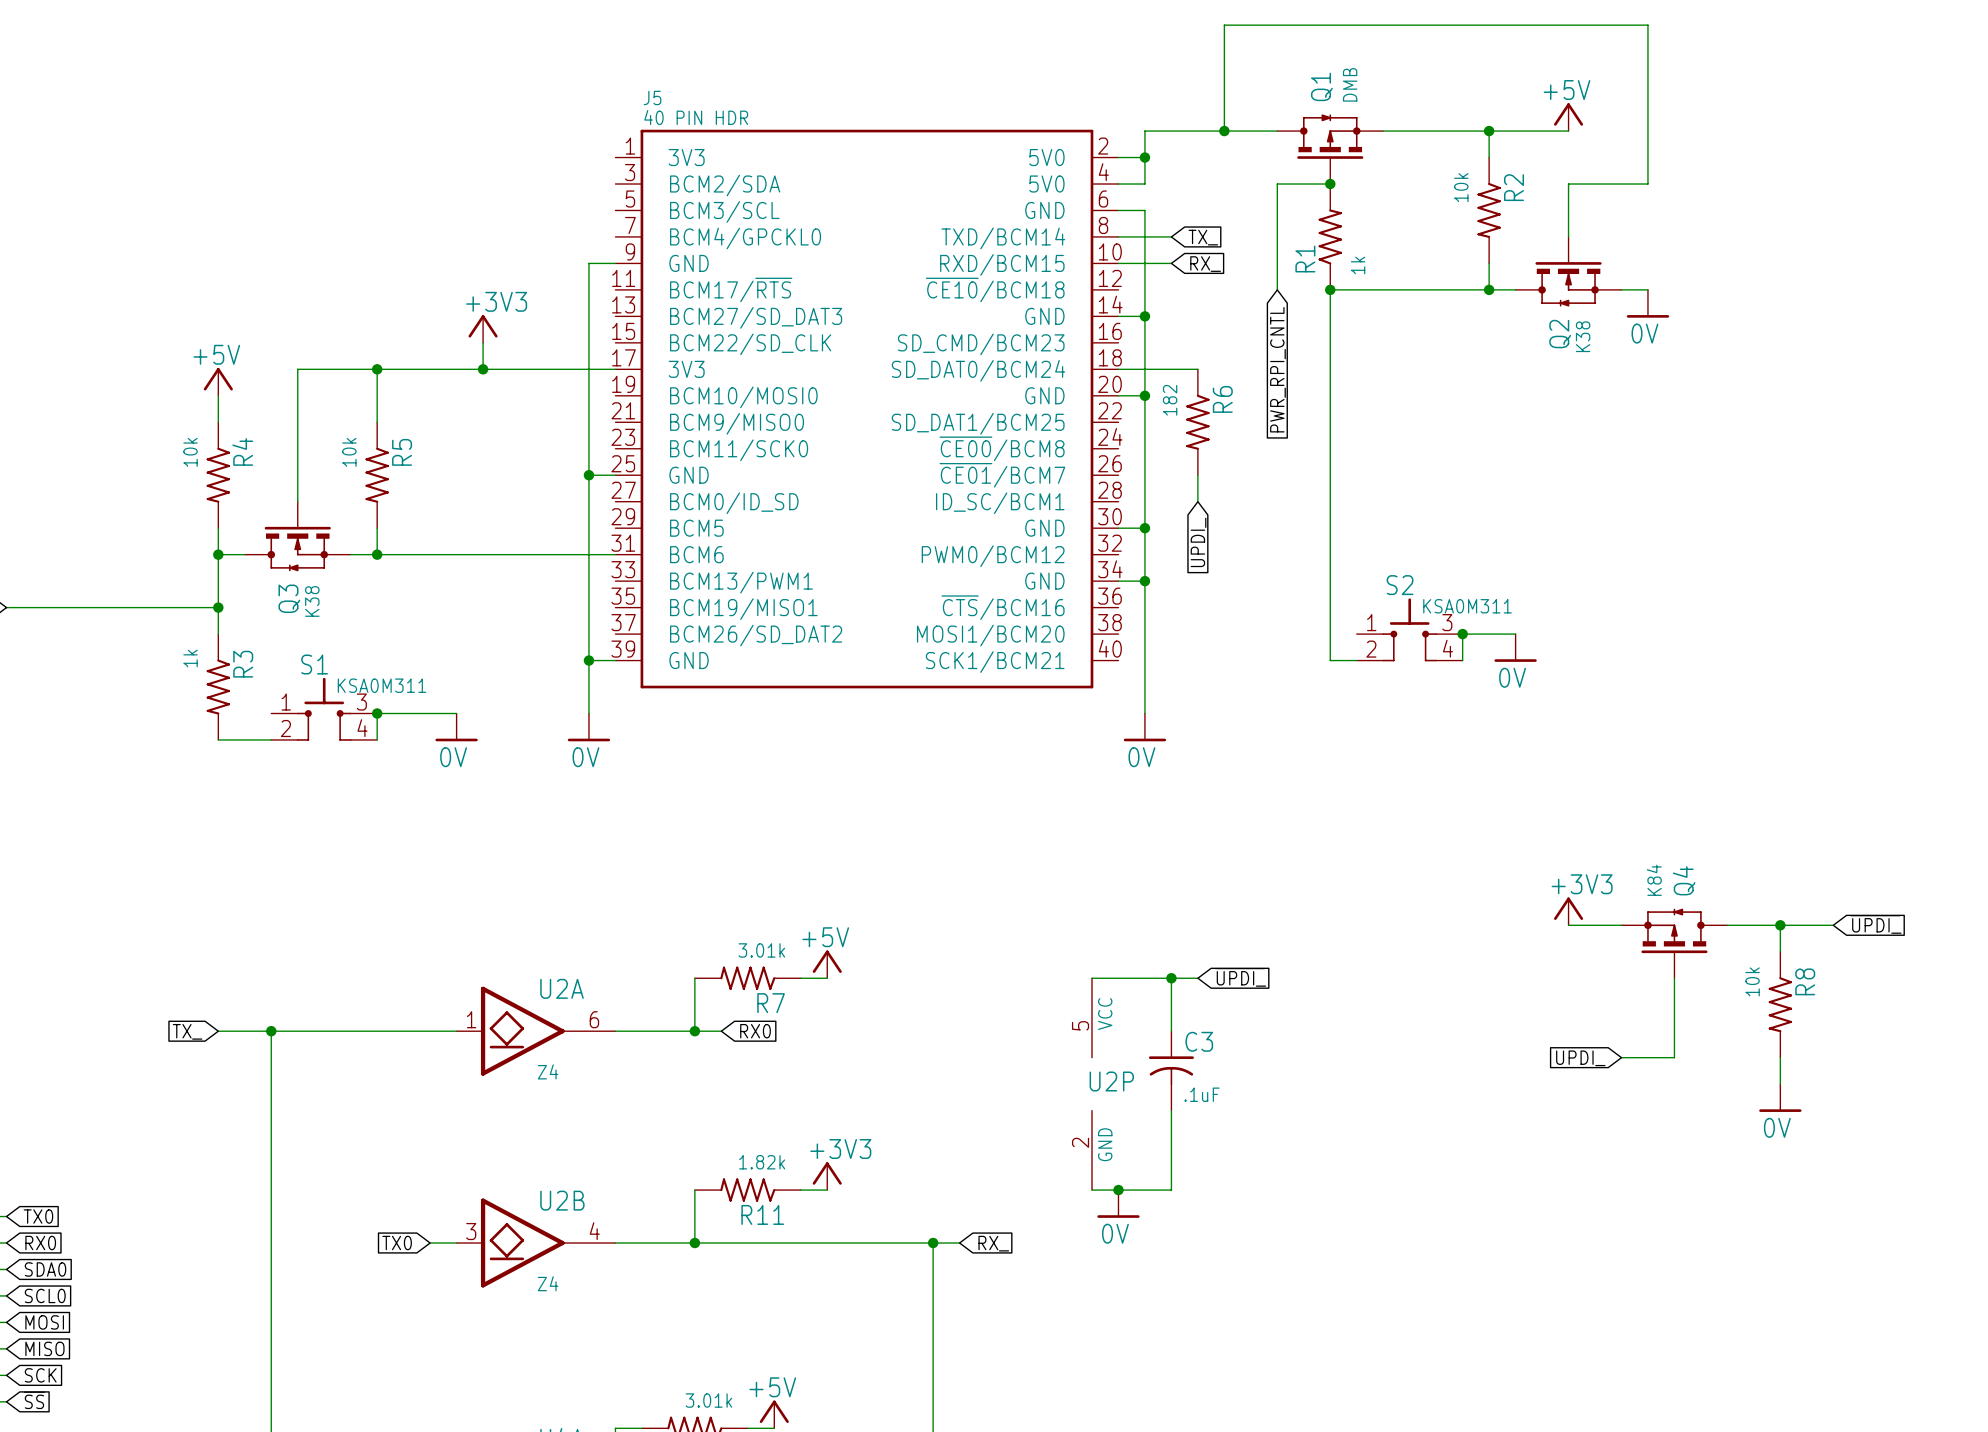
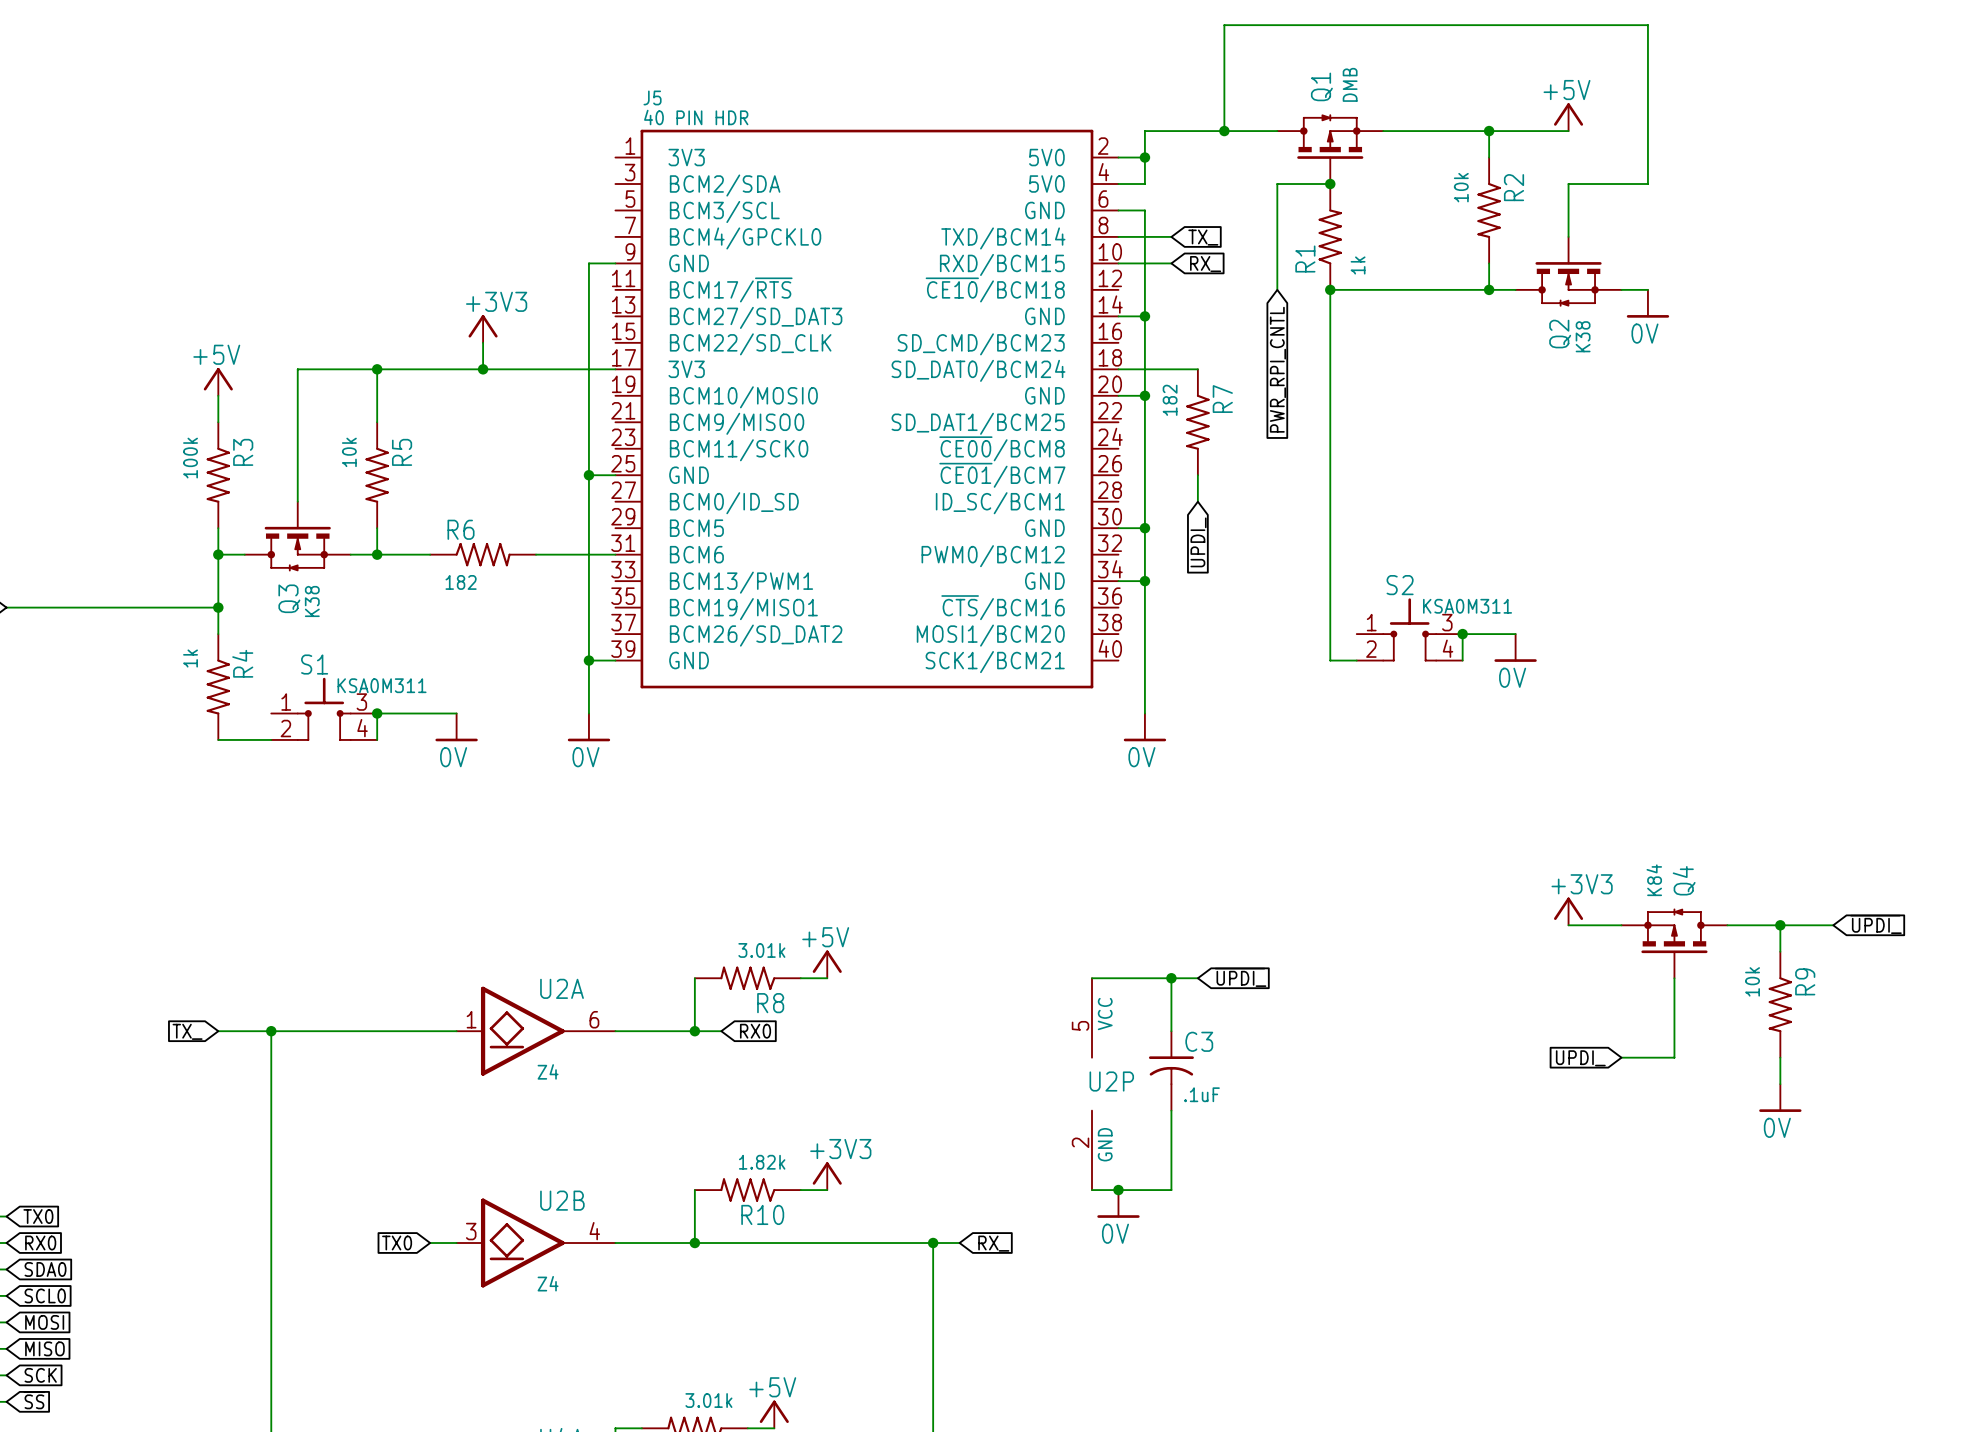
R6 name: R6 (1222, 399) -> R7 (1222, 399)
R4 name: R4 (242, 451) -> R3 (243, 452)
R4 value: 10k (190, 452) -> 100k (190, 458)
R6: none -> 182 (483, 554)
R3 name: R3 (243, 664) -> R4 (242, 663)
R8 name: R8 (1805, 981) -> R9 (1805, 981)
R7 name: R7 (771, 1003) -> R8 (770, 1003)
R11 name: R11 (762, 1214) -> R10 (762, 1214)

